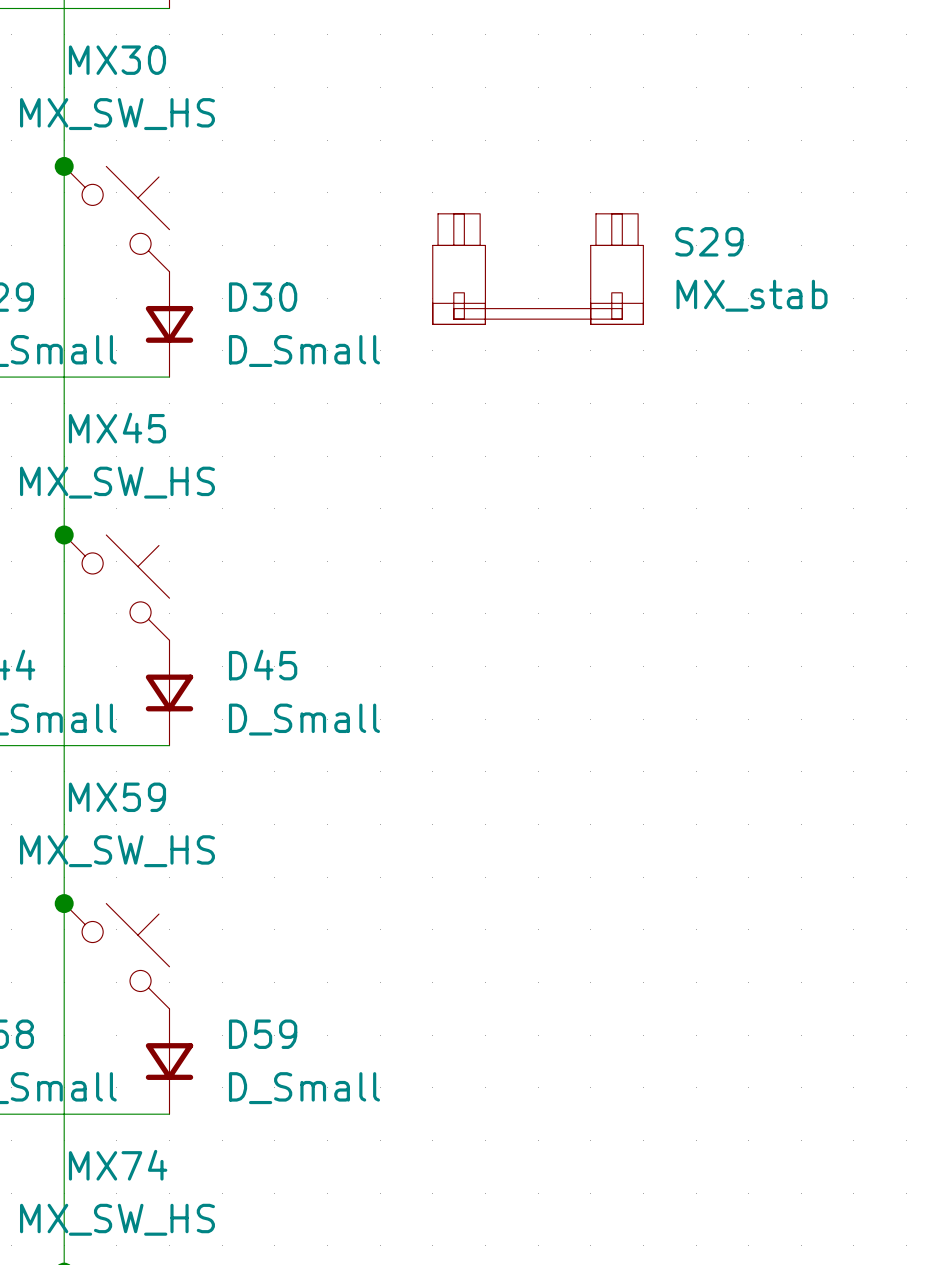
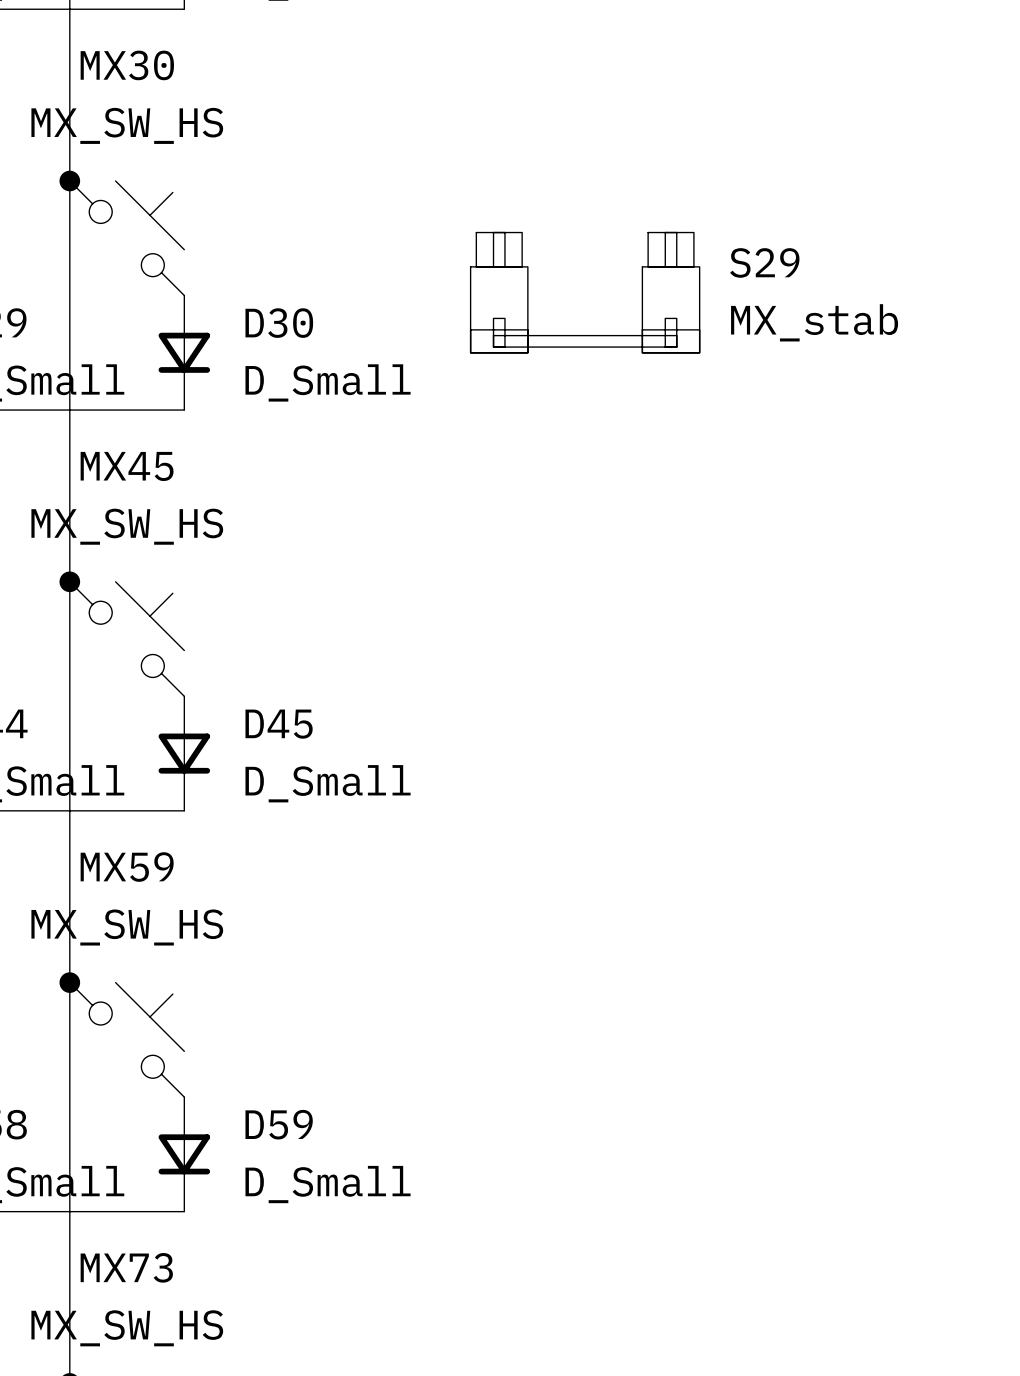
MX74 name: MX74 (118, 1165) -> MX73 (126, 1267)

